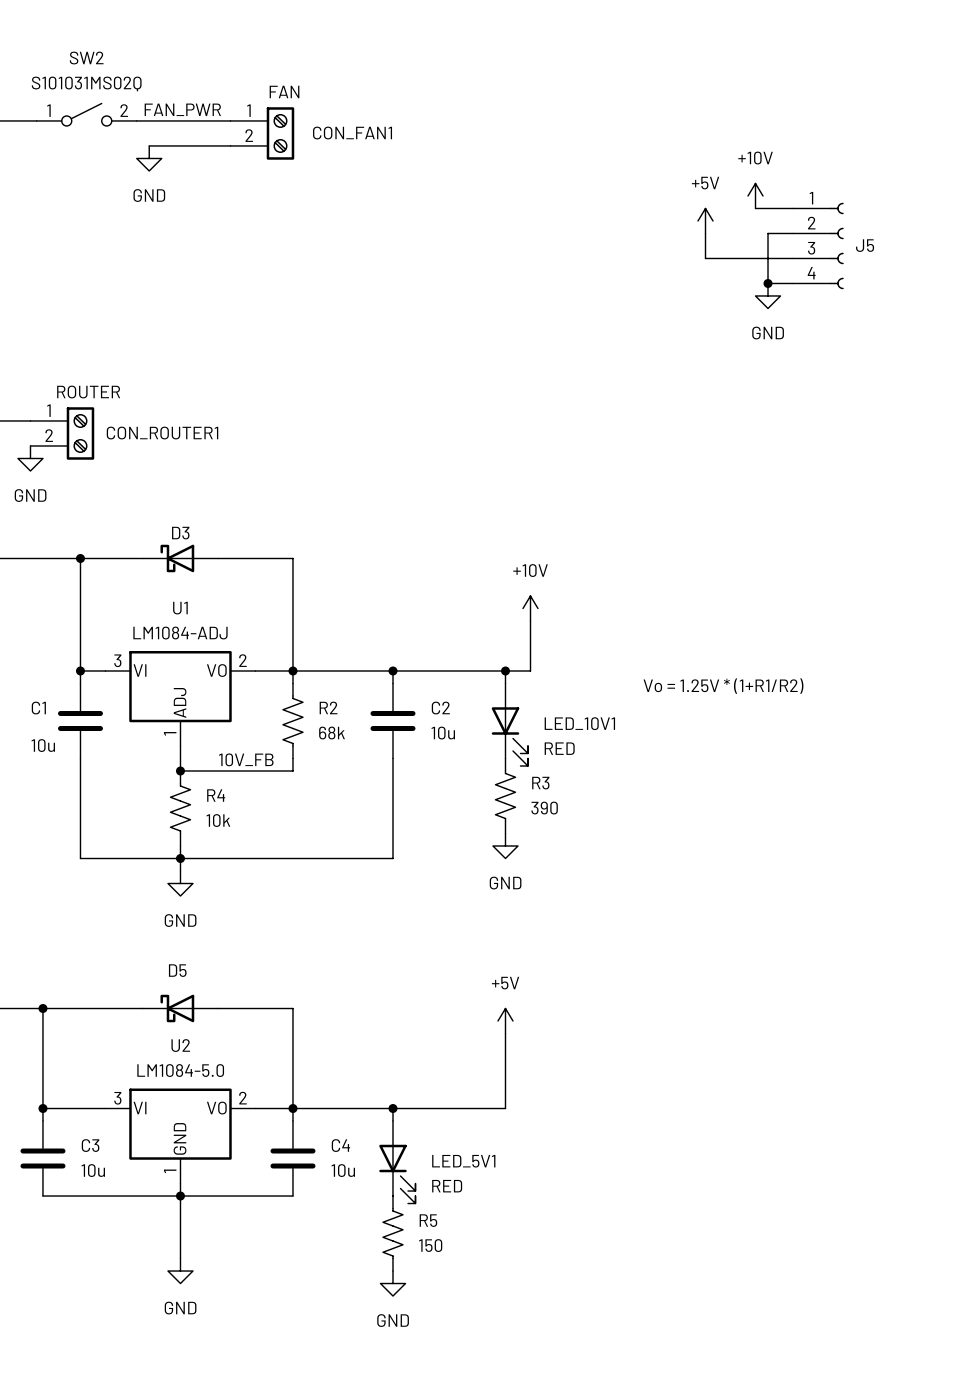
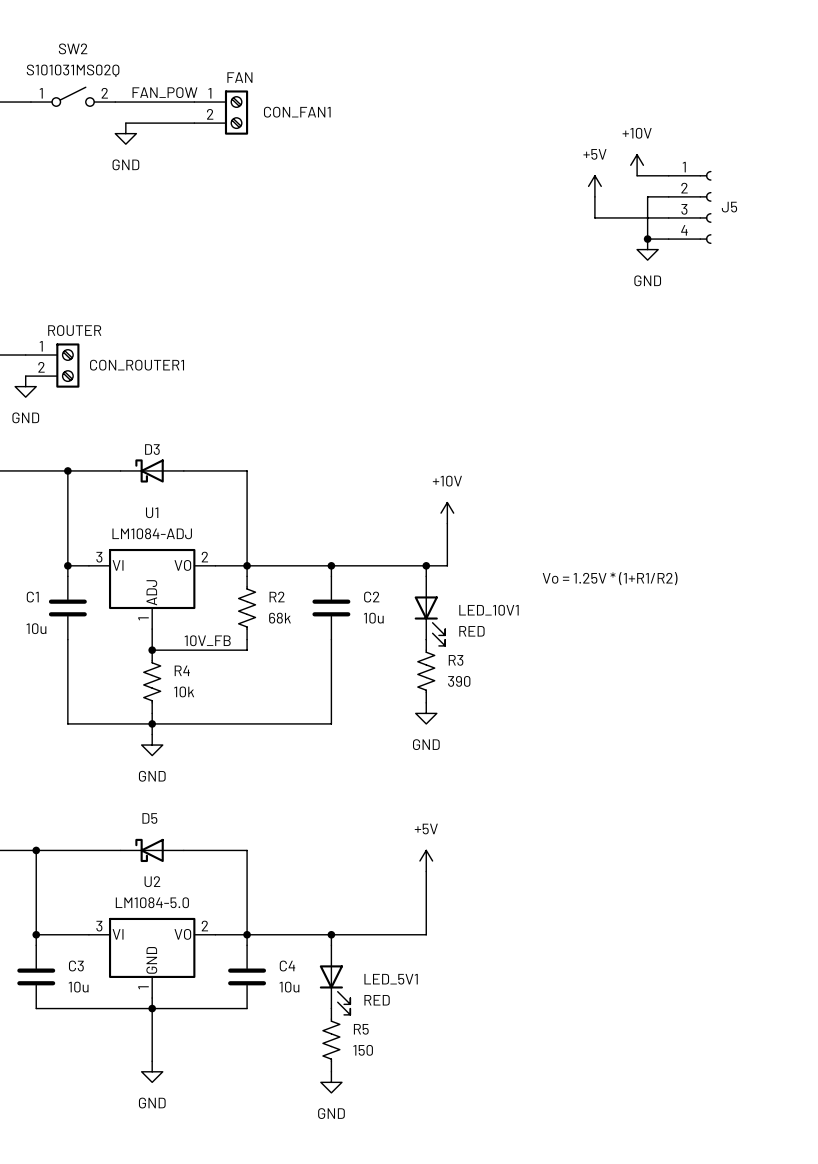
label: FAN_PWR (182, 109) -> FAN_POW (164, 92)

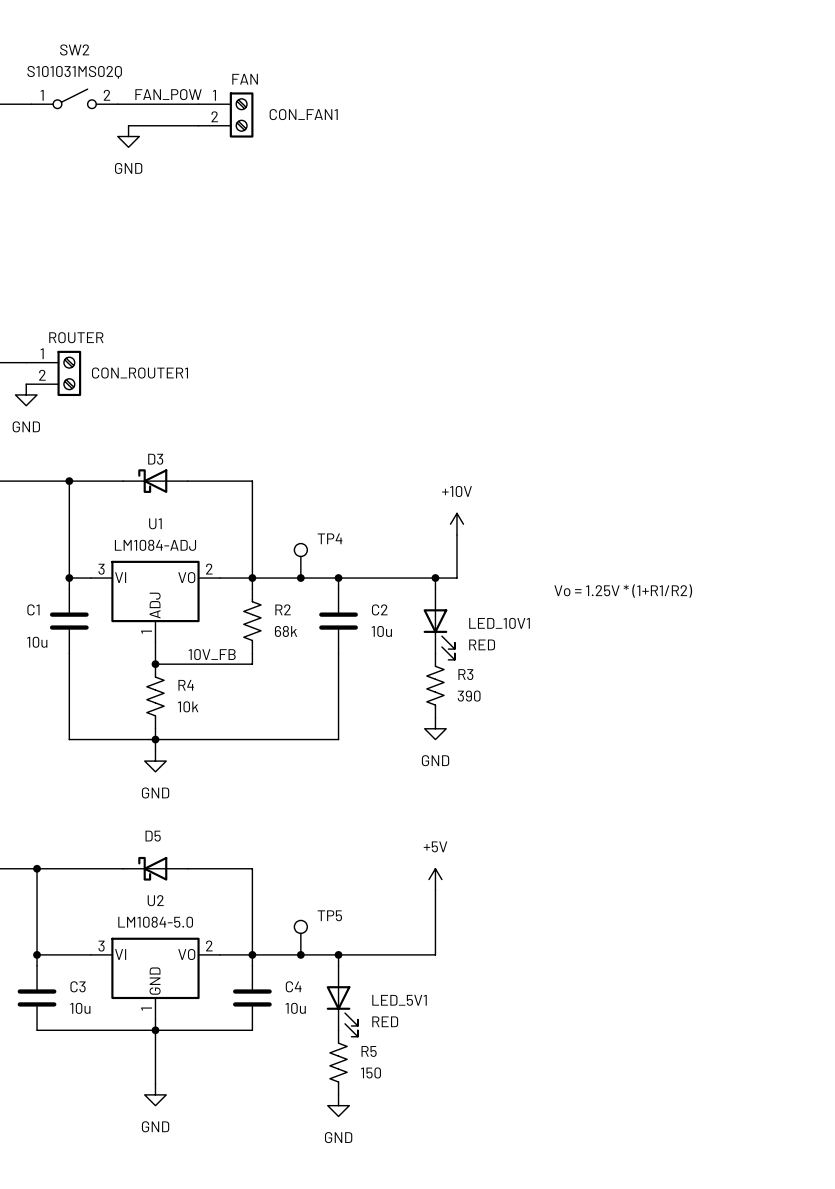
power symbol: +10V (637, 165) -> none
wire: (637, 175) (668, 175) -> none
power symbol: +5V (594, 186) -> none
wire: (594, 196) (594, 217) (668, 217) -> none
wire: (668, 196) (647, 196) (647, 239) (668, 239) -> none
J5: (690, 207) -> none
junction: (647, 239) -> none
power symbol: GND (647, 249) -> none
TP4: none -> (300, 560)
junction: none -> (300, 578)
TP5: none -> (300, 937)
junction: none -> (300, 954)

